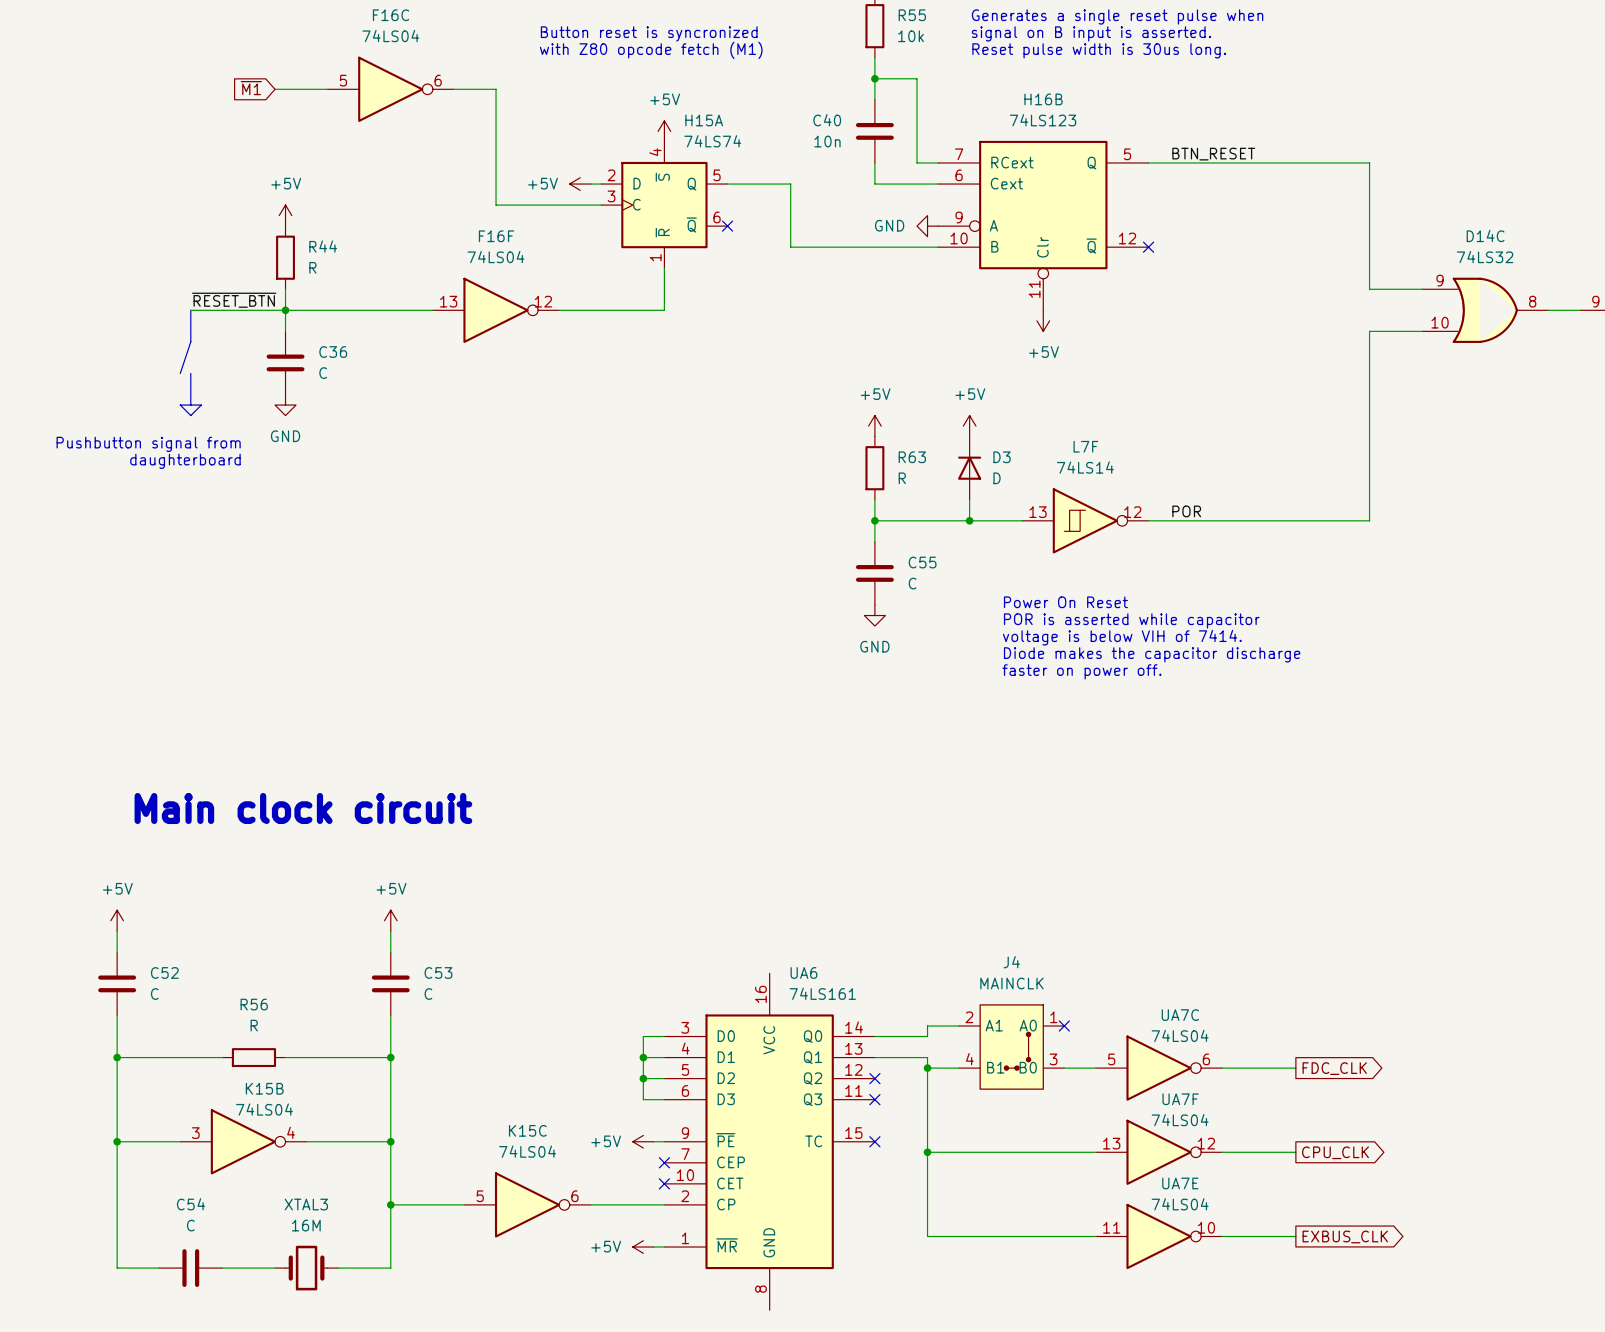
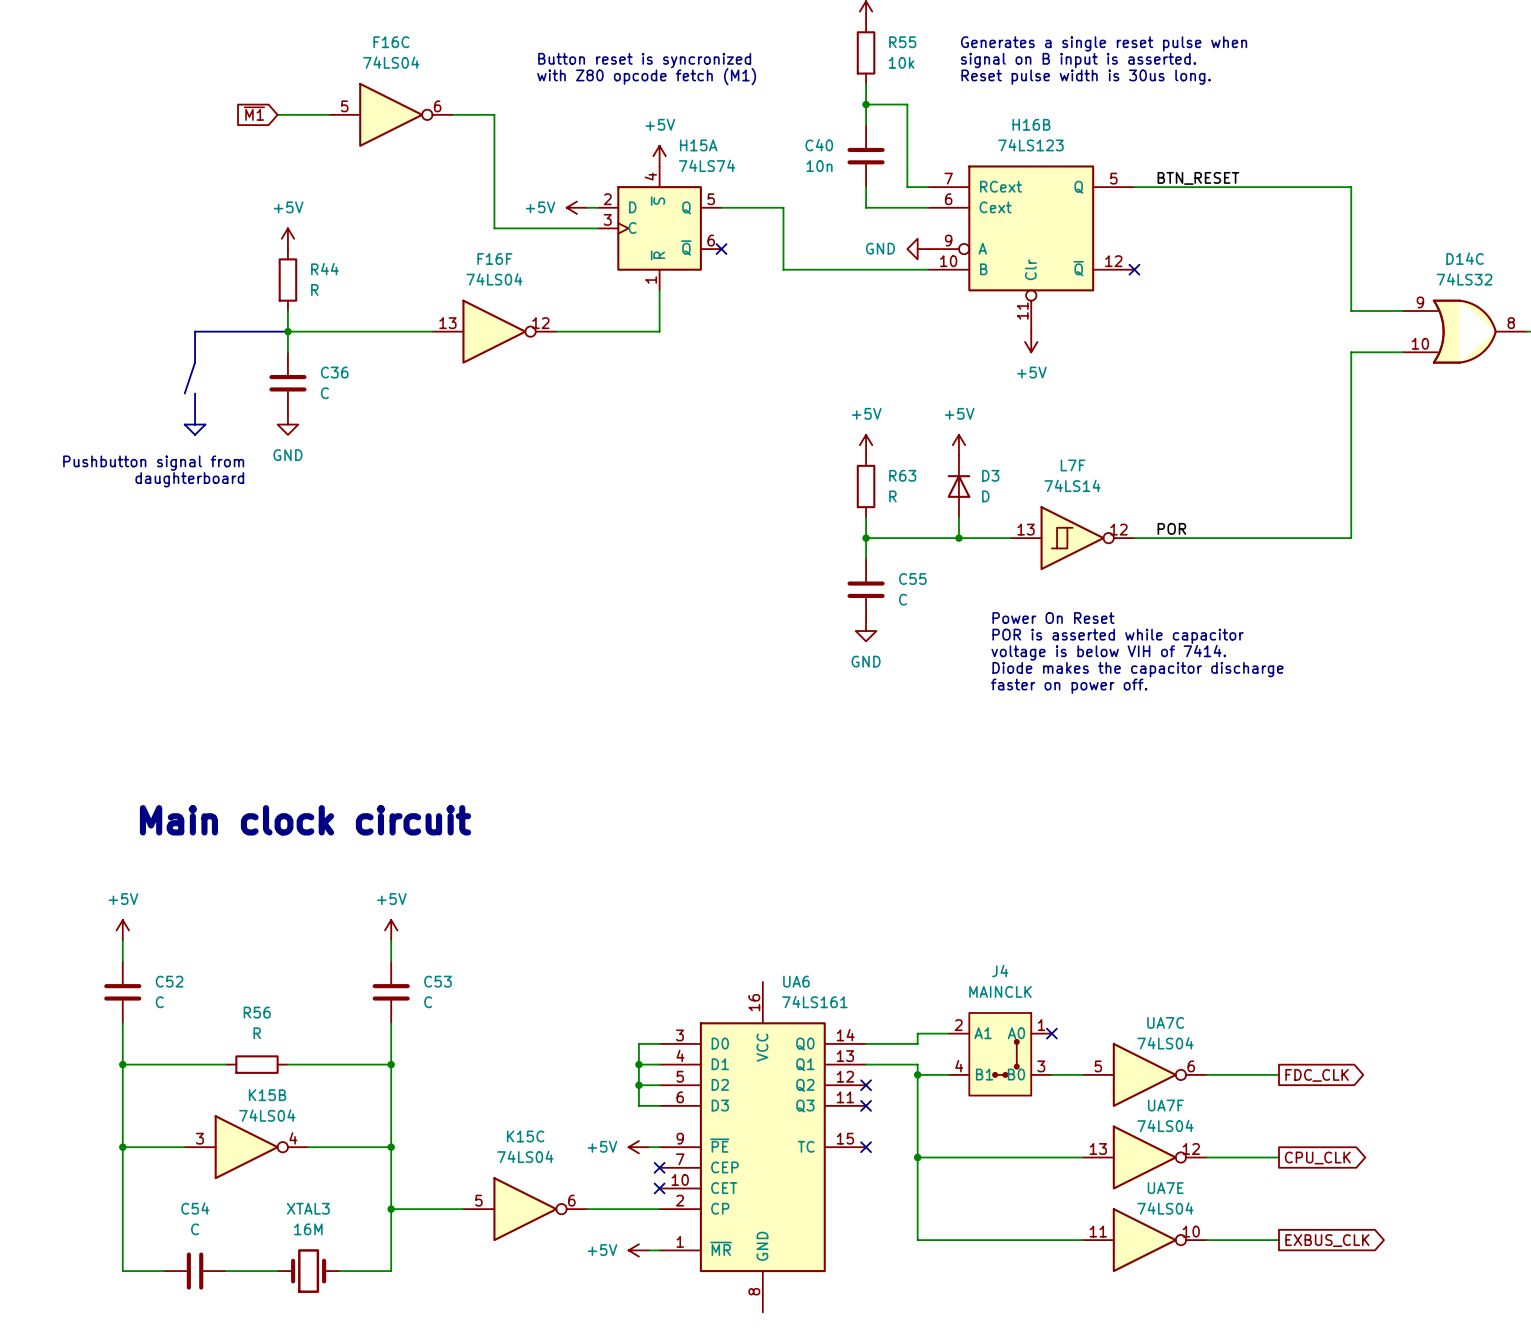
label: ~{RESET_BTN} (234, 300) -> none
line: none -> (195, 331) (287, 331)

